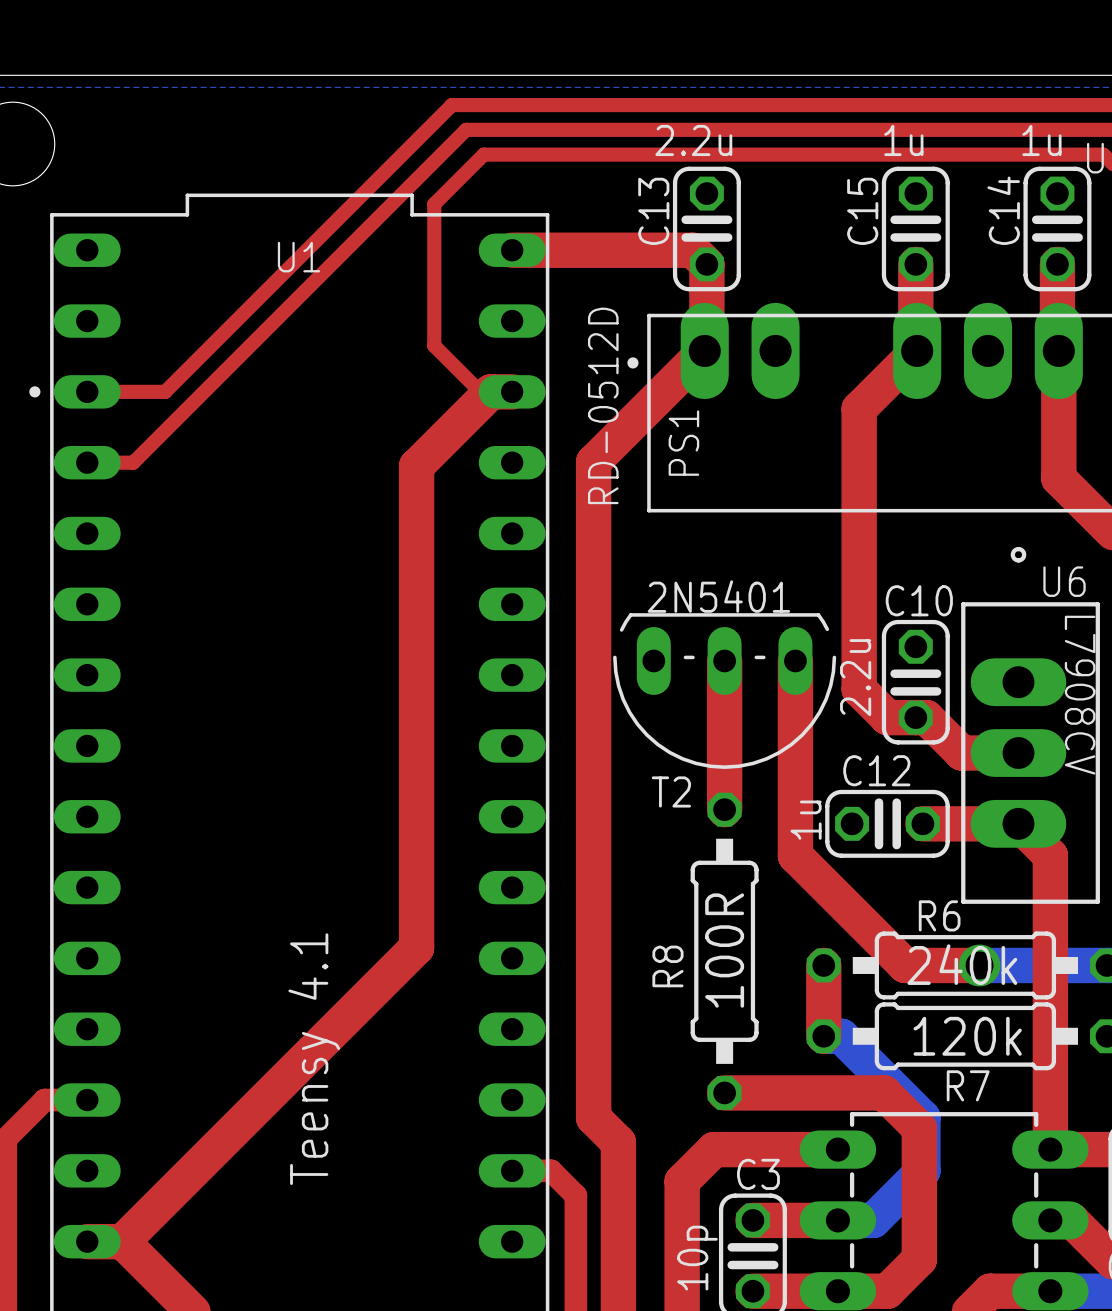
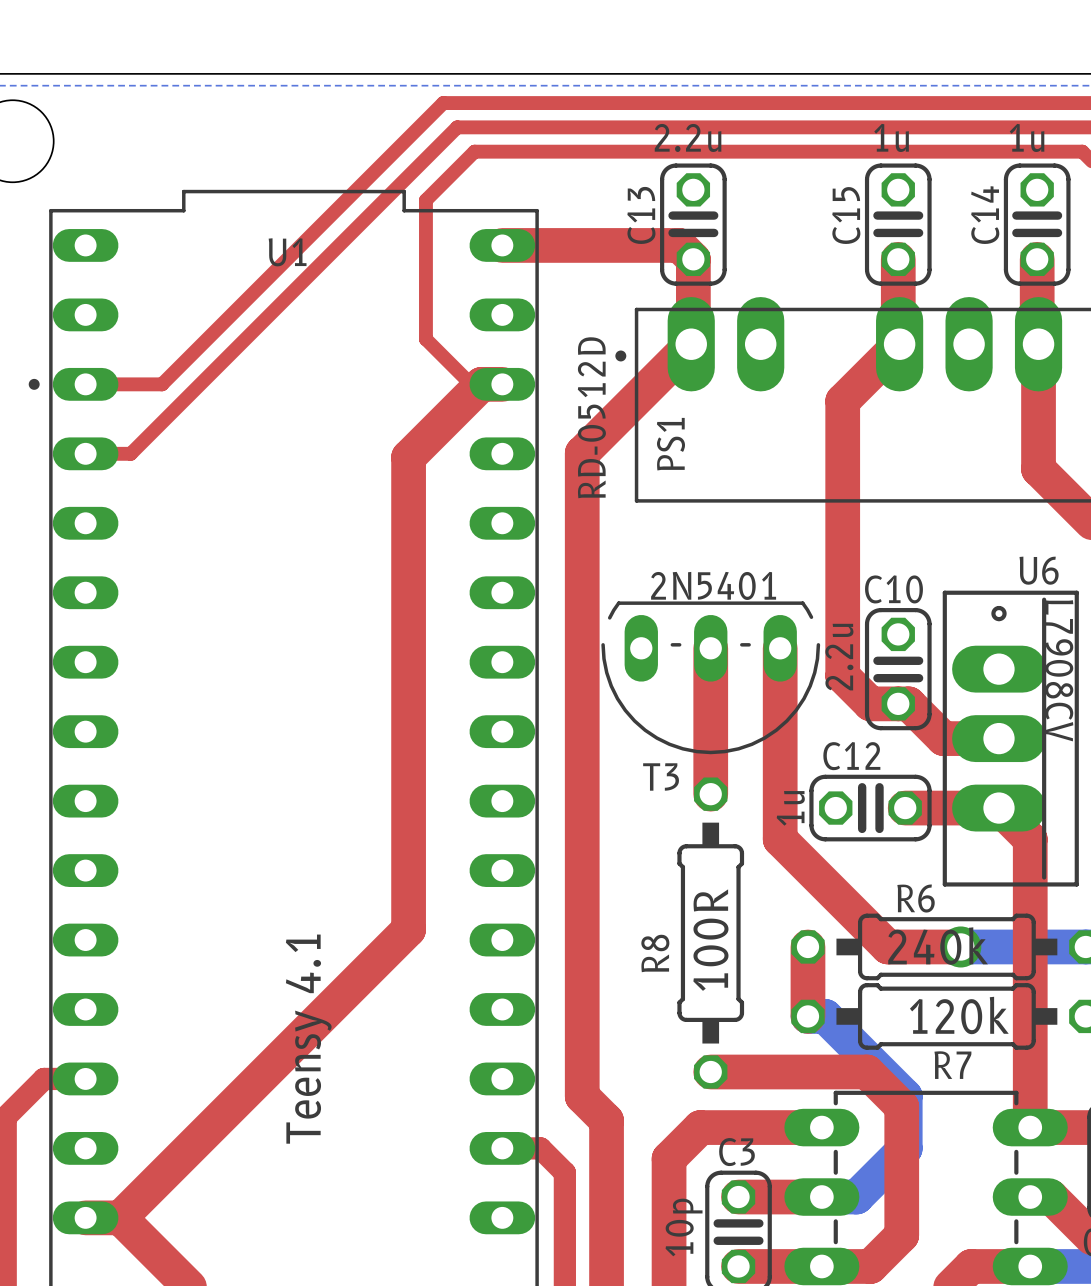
U6 footprint: [961, 546, 1100, 904] -> [942, 590, 1079, 887]
T2 name: T2 (671, 791) -> T3 (661, 776)

